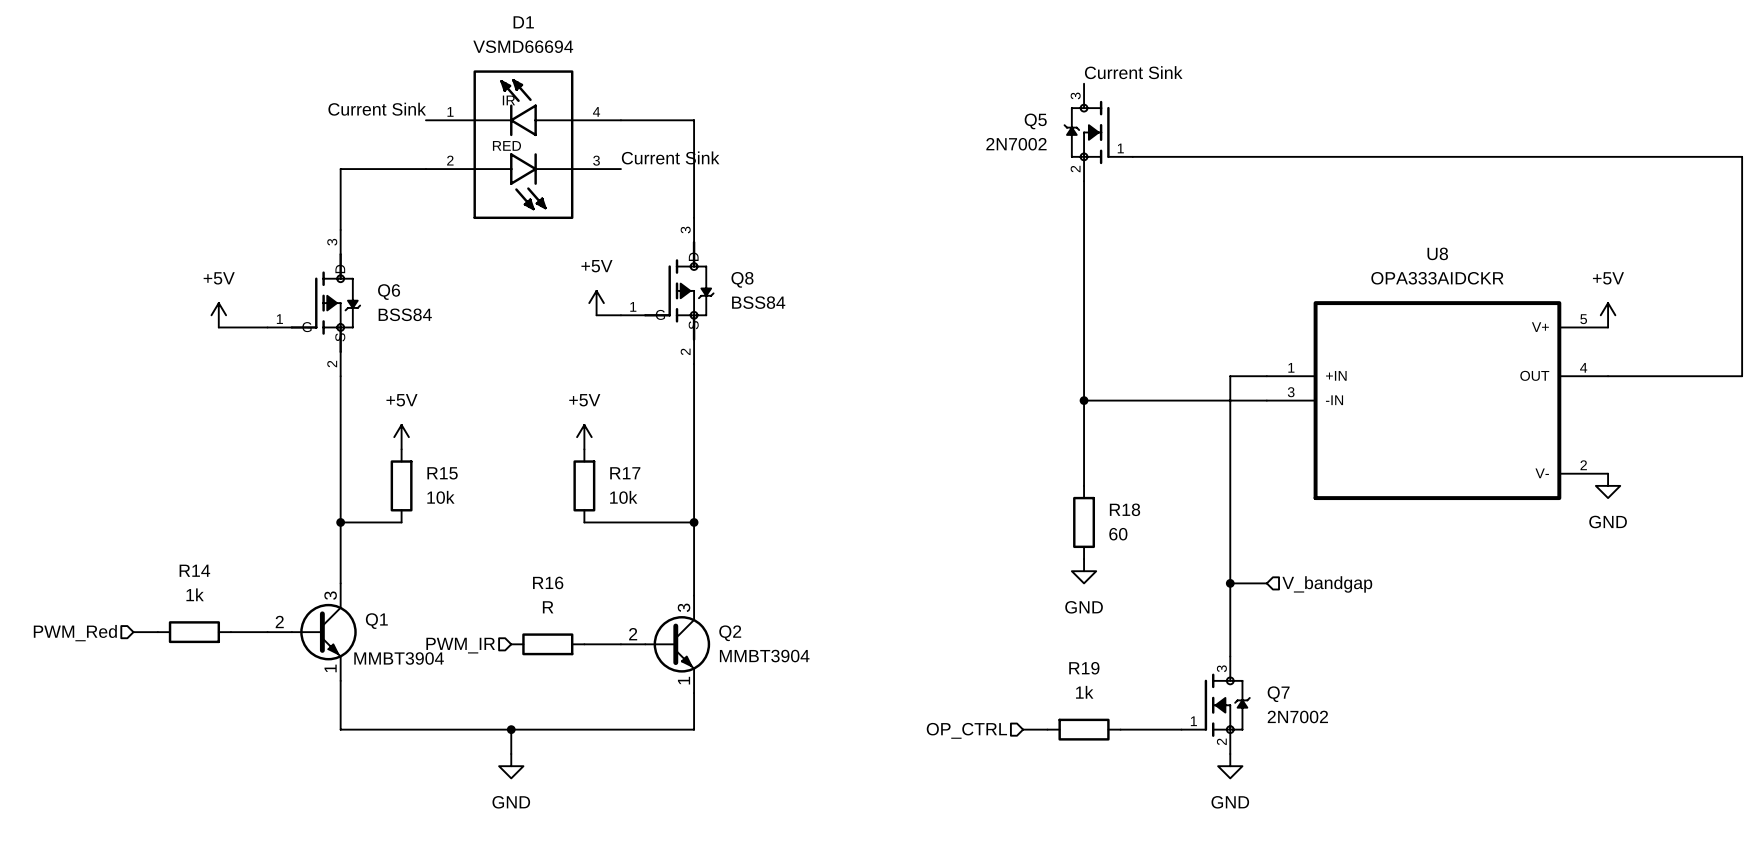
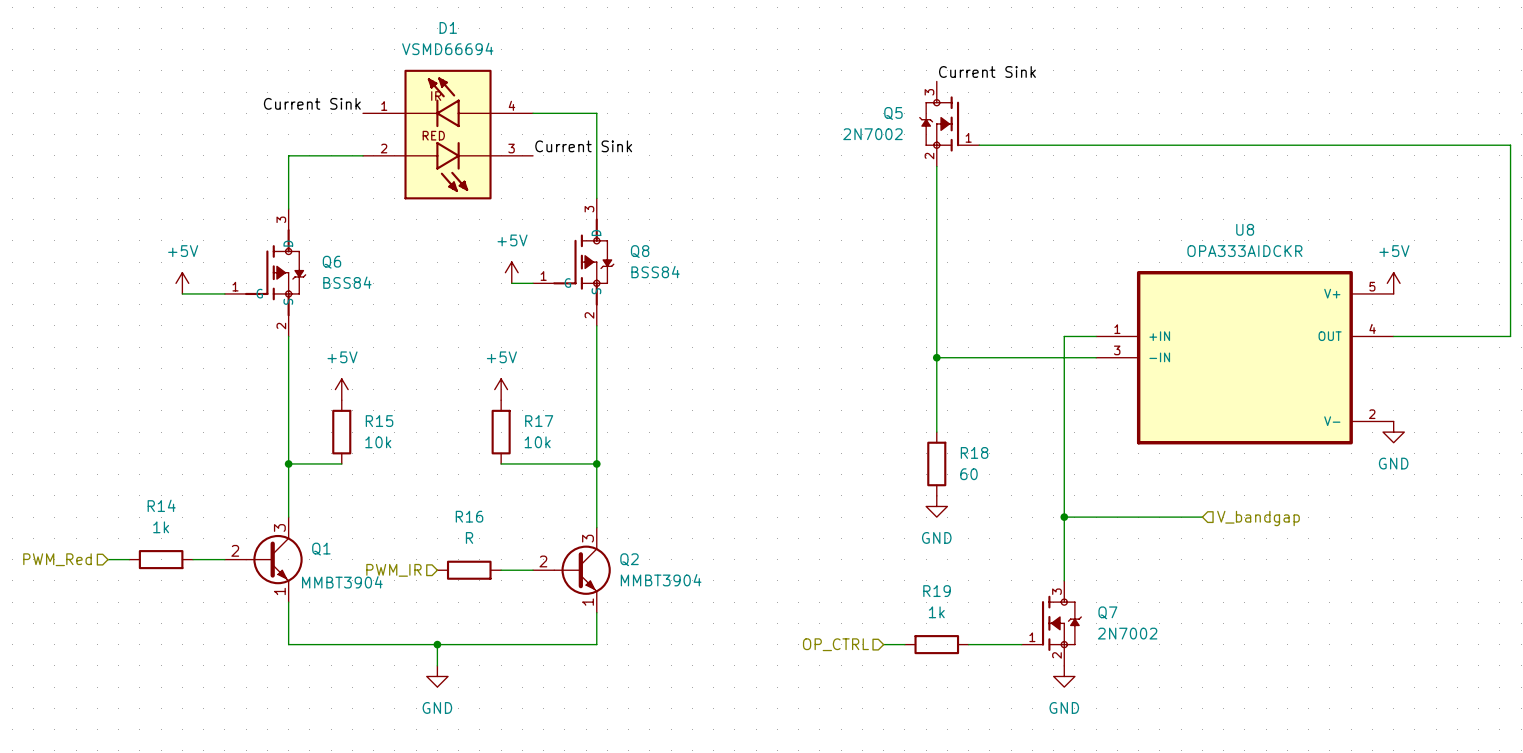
wire: none -> (1096, 517) (1202, 517)
hierarchical label position: V_bandgap (1327, 584) -> V_bandgap (1258, 518)

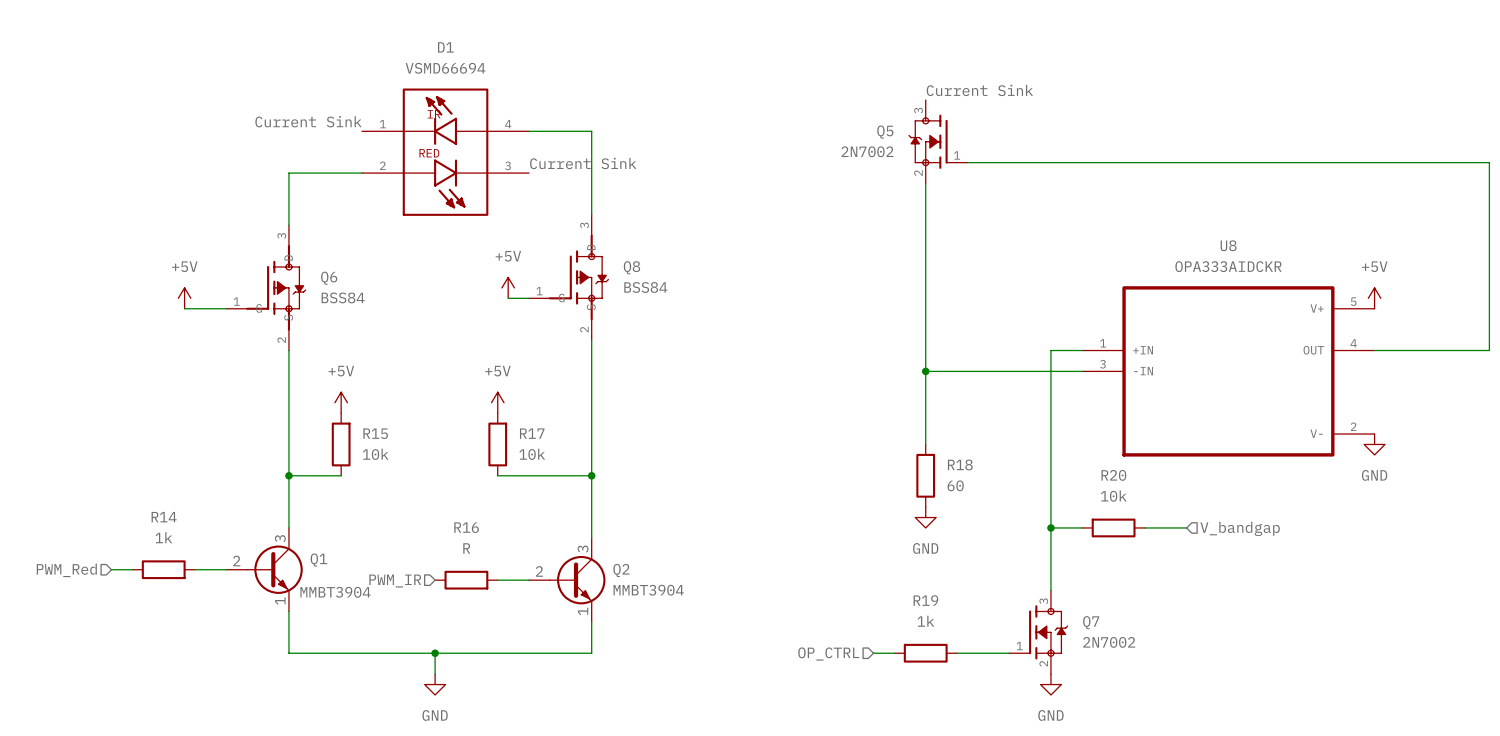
wire: (1096, 517) (1159, 517) -> none
R20: none -> 10k (1113, 527)

